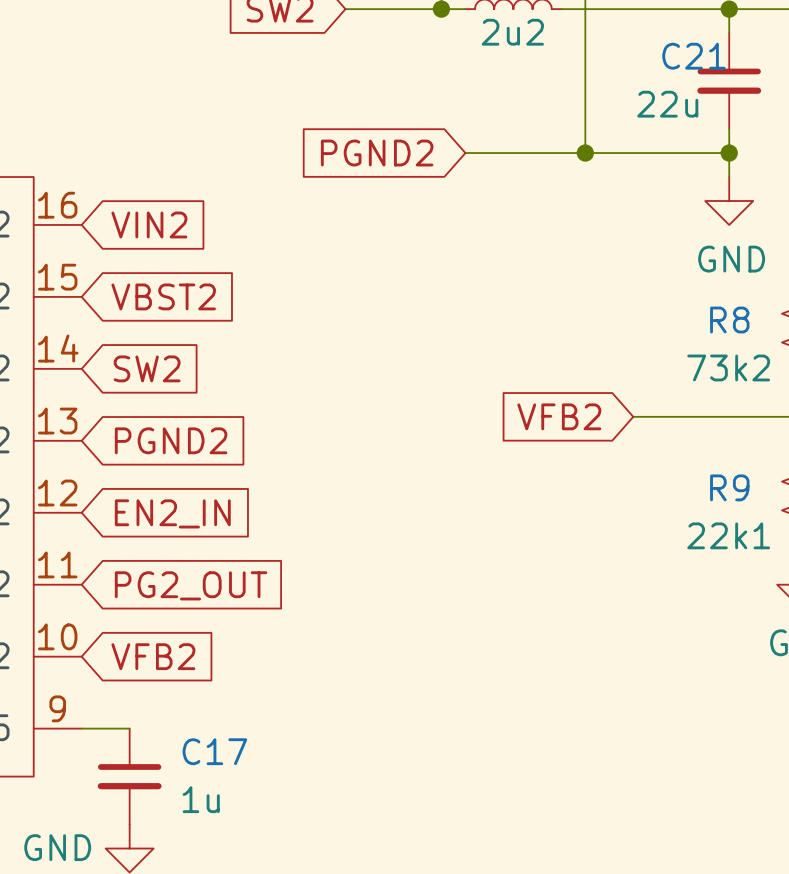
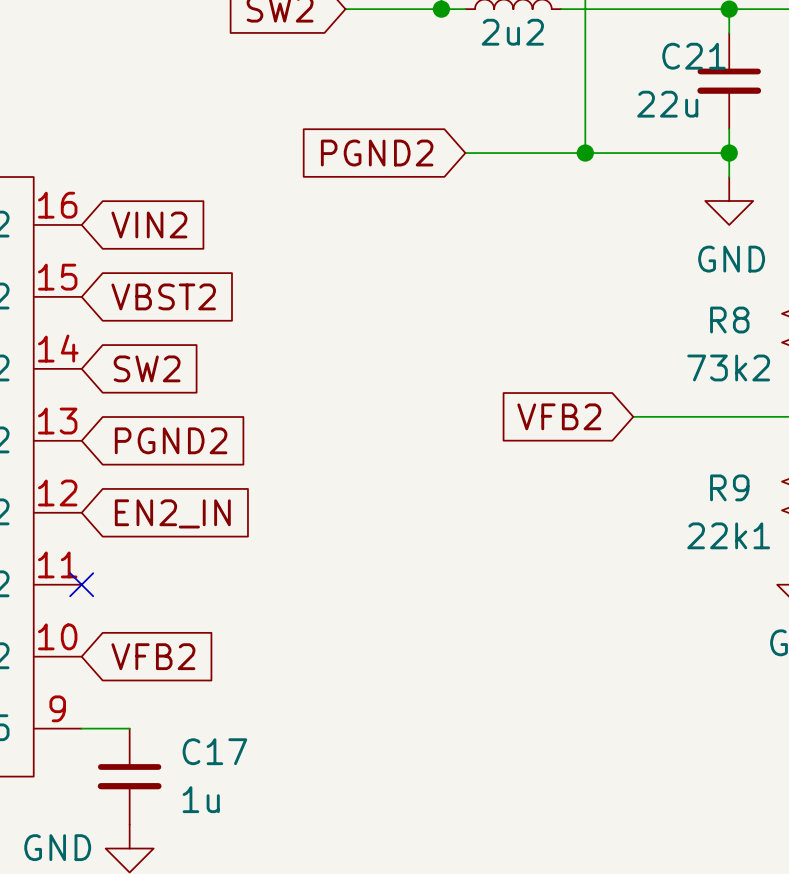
no-connect mark: none -> (81, 584)
global label: PG2_OUT (191, 585) -> none

